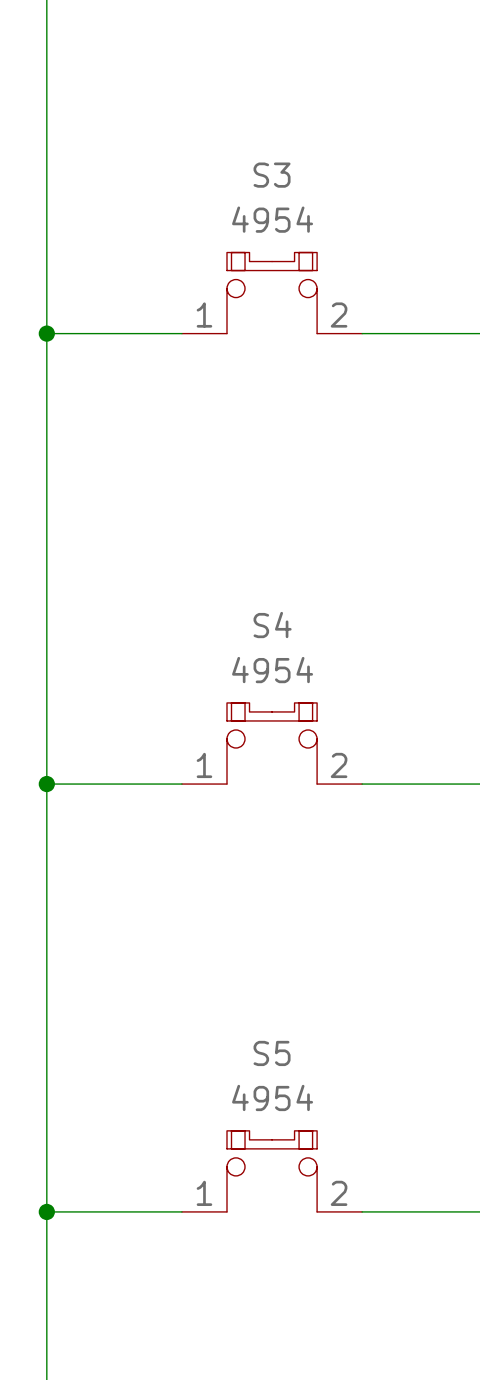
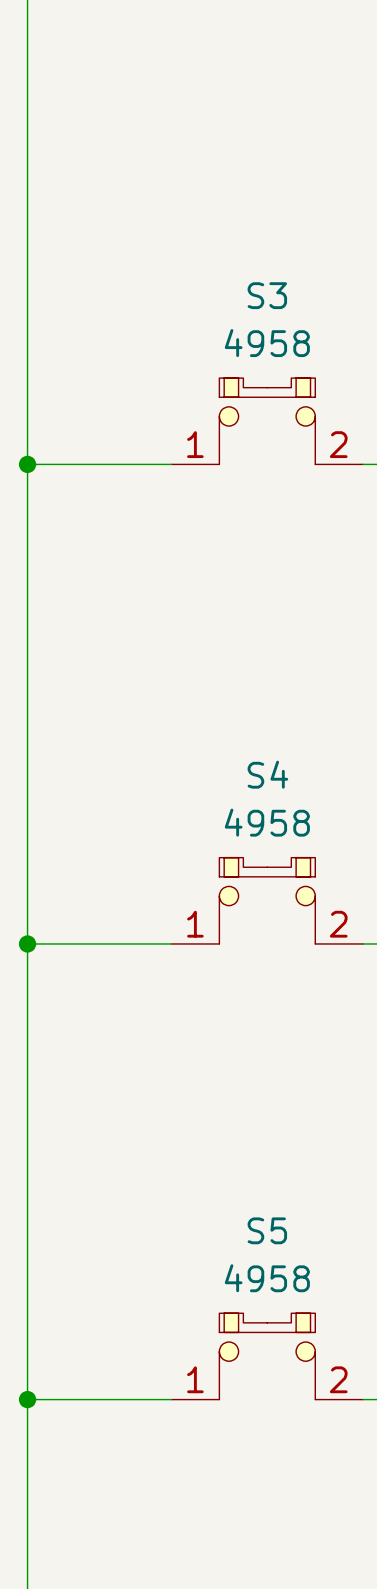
S3 value: 4954 (272, 219) -> 4958 (267, 343)
S4 value: 4954 (272, 670) -> 4958 (267, 822)
S5 value: 4954 (272, 1097) -> 4958 (267, 1278)

